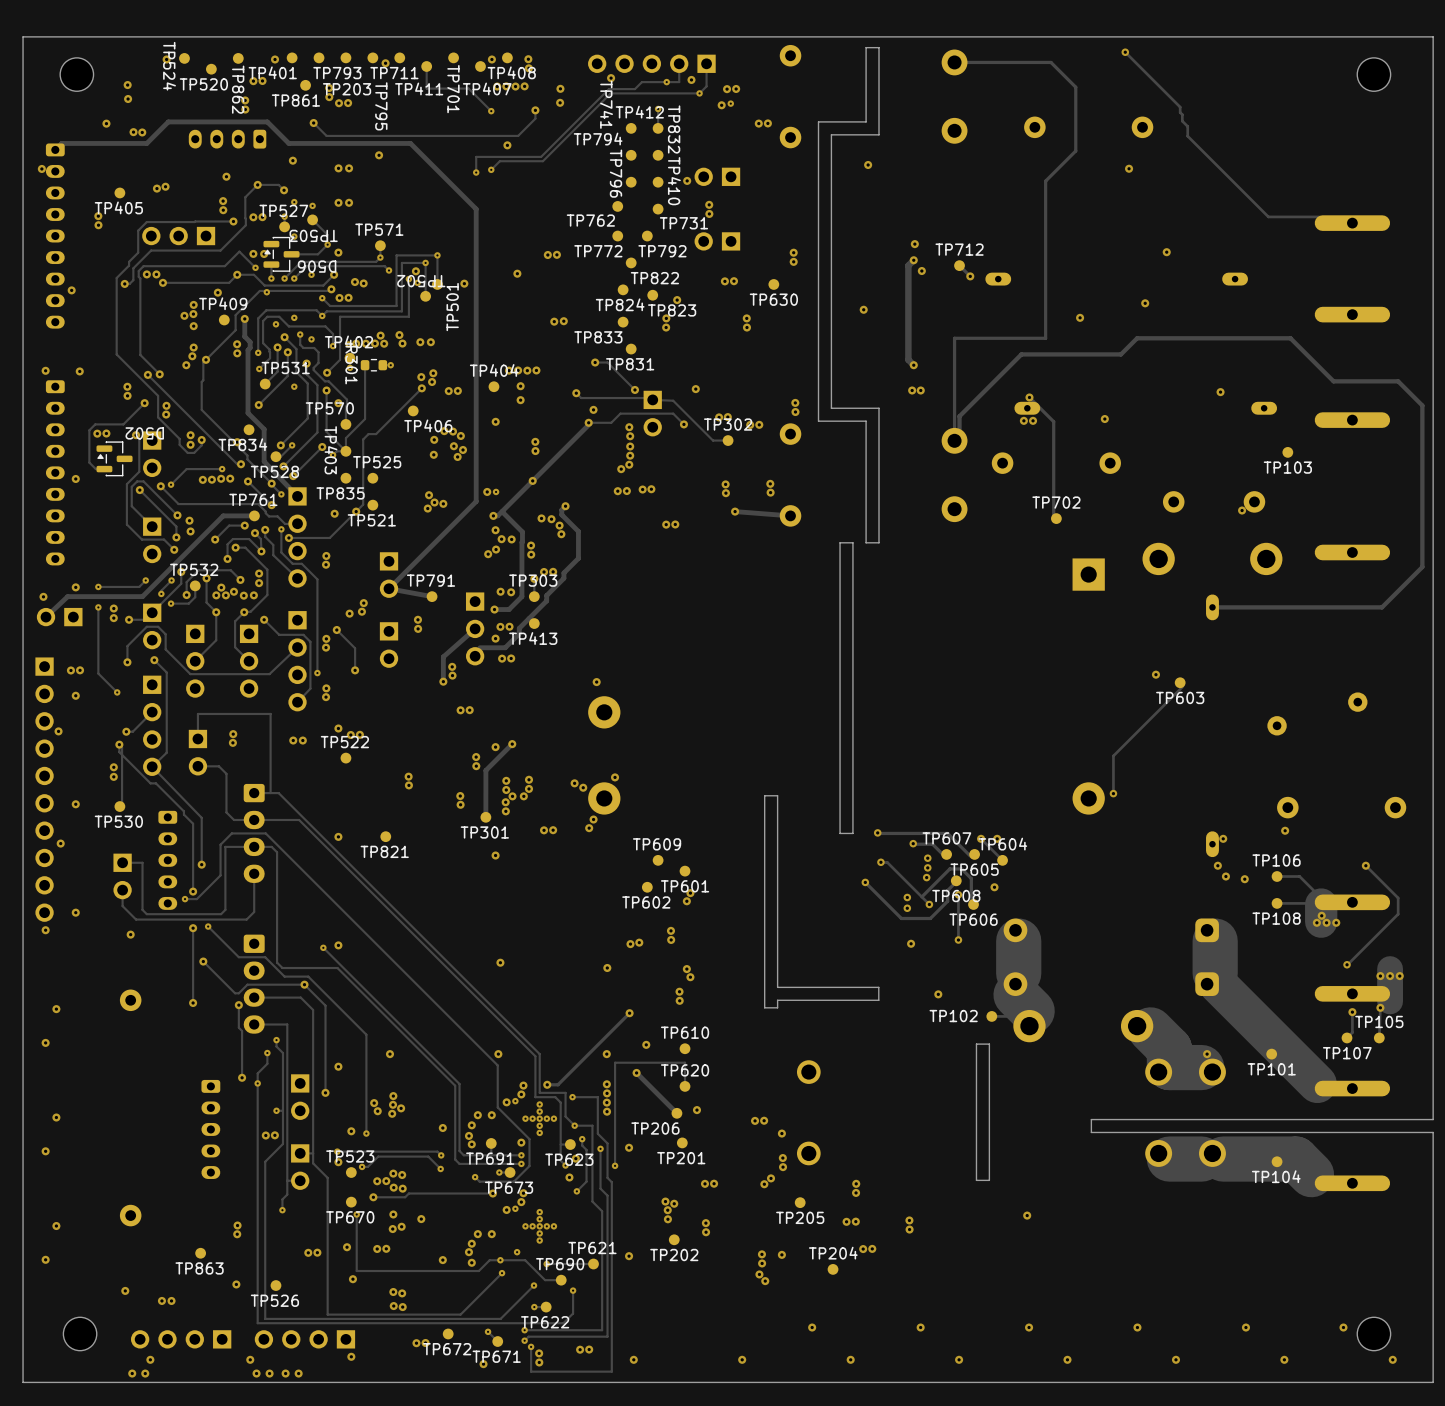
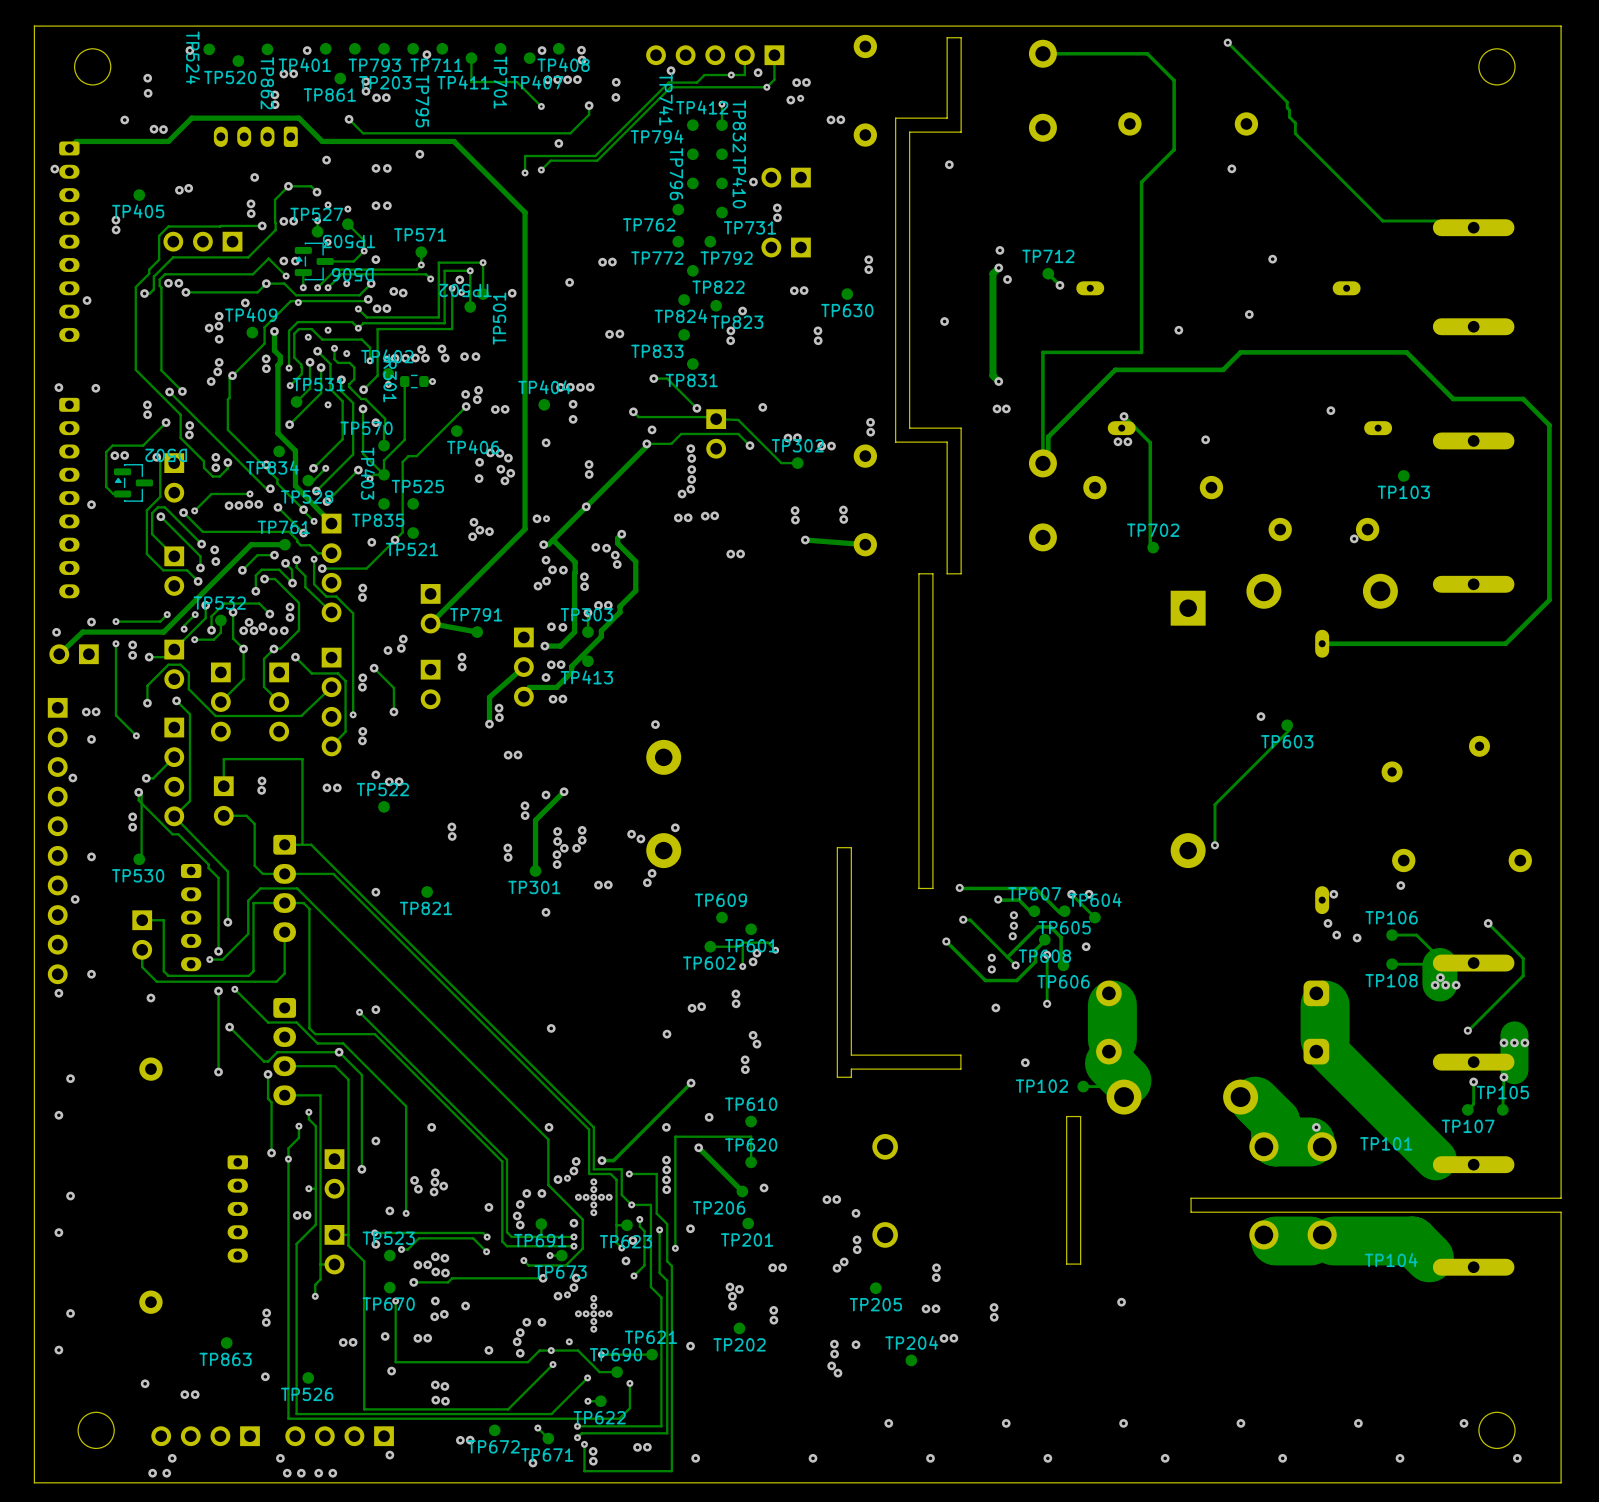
track: none -> (742, 942) (742, 966)
track: none -> (742, 942) (768, 942) (775, 950)
track: none -> (742, 942) (738, 946) (710, 946)
via: none -> (775, 950)
via: none -> (742, 966)

